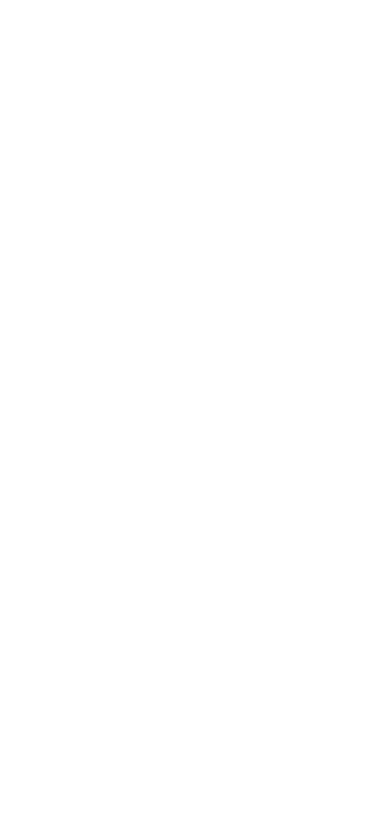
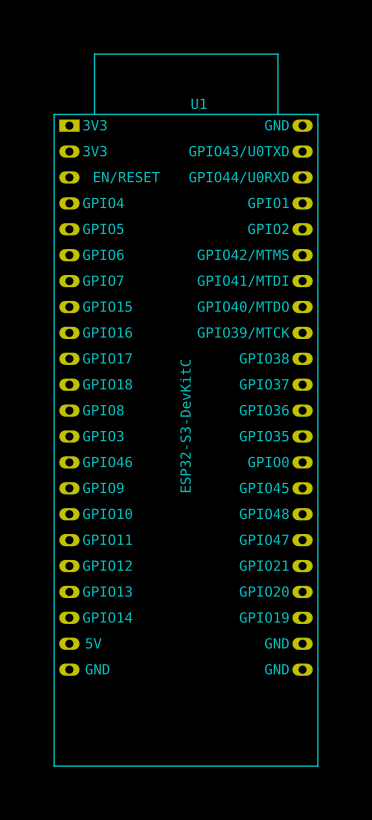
U1: none -> ESP32-S3-DevKitC (185, 410)

